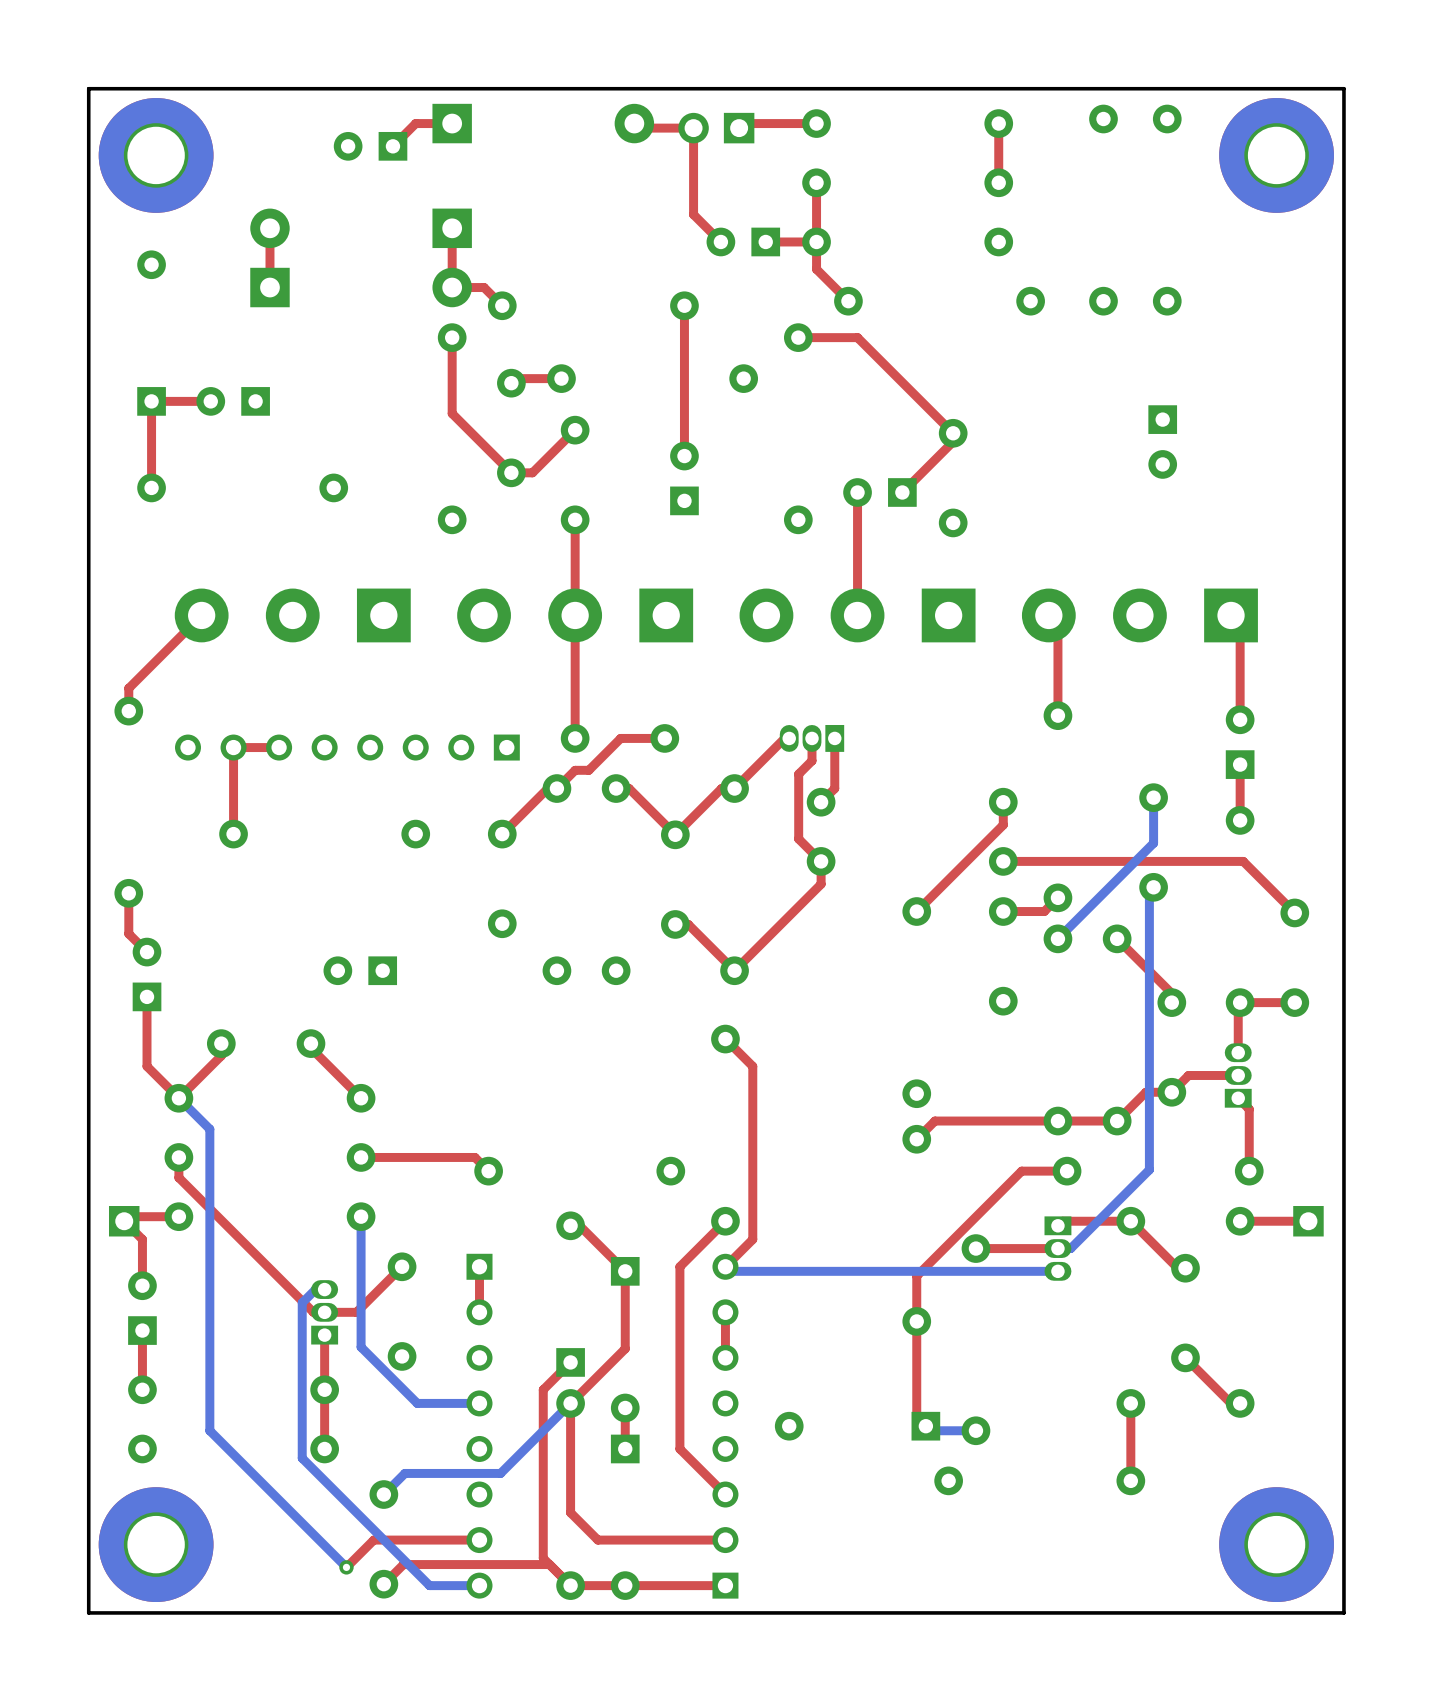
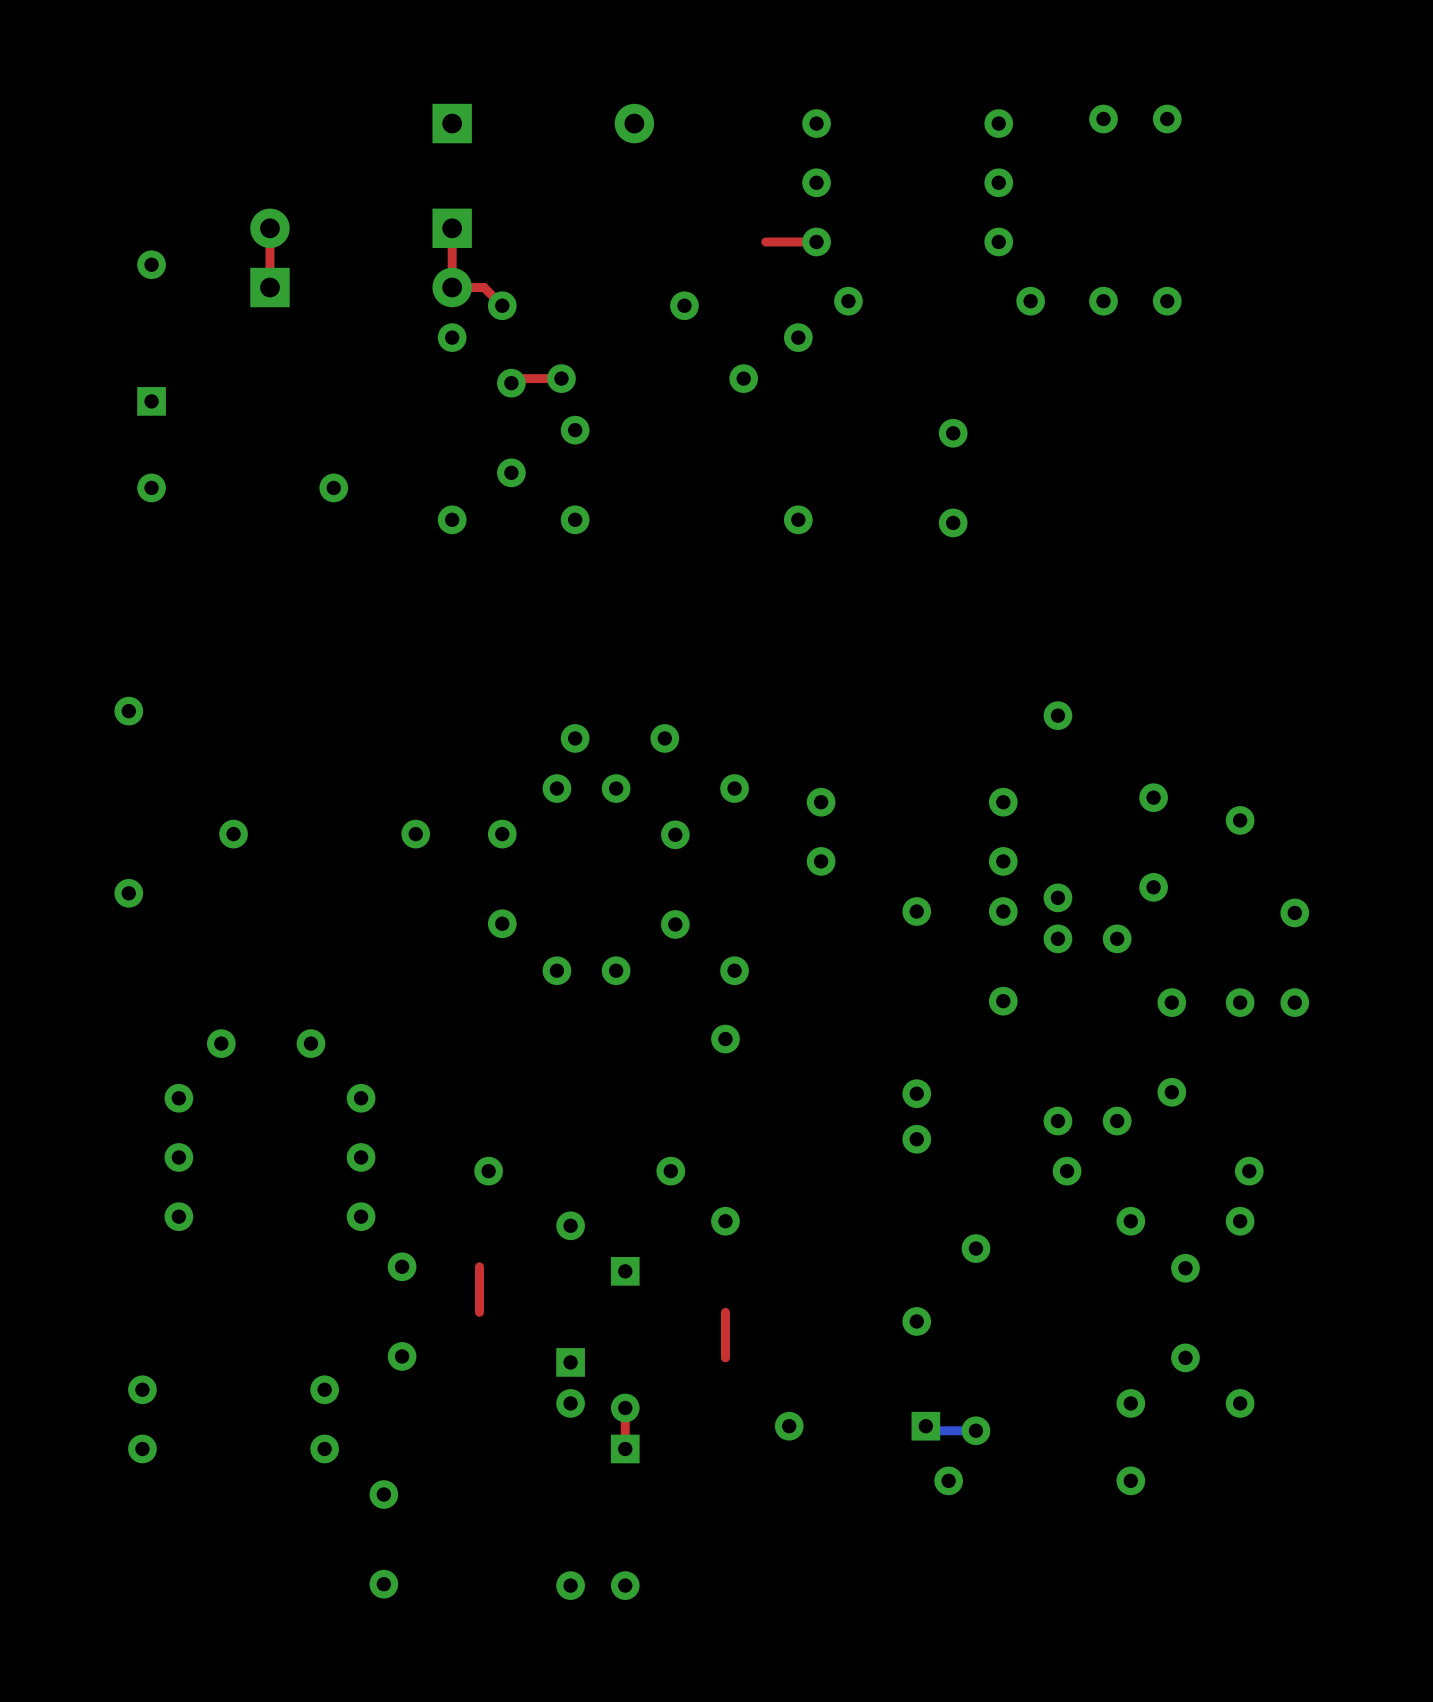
board edge: (1343, 88) (88, 88) (88, 1612) (1343, 1612) (1343, 88) -> none
top track: (452, 123) (415, 123) (392, 146) -> none
top track: (634, 123) (638, 128) (693, 128) (693, 214) (720, 241) -> none
top track: (816, 123) (743, 123) (739, 128) -> none
top track: (998, 123) (998, 182) -> none
part: (716, 128) -> none
part: (370, 146) -> none
part: (156, 155) -> none
part: (1276, 155) -> none
top track: (816, 182) (816, 269) (848, 301) -> none
part: (743, 241) -> none
top track: (684, 305) (684, 456) -> none
top track: (452, 337) (452, 413) (511, 472) (532, 472) (575, 430) -> none
top track: (798, 337) (857, 337) (953, 433) (953, 441) (902, 492) -> none
top track: (210, 401) (151, 401) (151, 487) -> none
part: (233, 401) -> none
part: (1162, 442) -> none
part: (684, 478) -> none
top track: (857, 492) (857, 615) -> none
part: (879, 492) -> none
top track: (575, 519) (575, 738) -> none
top track: (201, 615) (128, 688) (128, 711) -> none
part: (292, 615) -> none
part: (575, 615) -> none
part: (857, 615) -> none
top track: (1048, 615) (1057, 624) (1057, 715) -> none
part: (1139, 615) -> none
top track: (1240, 615) (1240, 719) -> none
top track: (664, 738) (620, 738) (588, 770) (575, 770) (556, 788) (547, 788) (502, 834) -> none
top track: (789, 738) (784, 738) (734, 788) (721, 788) (675, 834) (629, 788) (616, 788) -> none
top track: (811, 738) (811, 760) (798, 774) (798, 839) (821, 861) (821, 884) (734, 970) (688, 924) (675, 924) -> none
part: (811, 738) -> none
top track: (834, 738) (834, 788) (821, 802) -> none
part: (1240, 742) -> none
top track: (279, 747) (233, 747) (233, 834) -> none
part: (347, 747) -> none
top track: (1240, 764) (1240, 820) -> none
bottom track: (1153, 797) (1153, 843) (1057, 938) -> none
top track: (1003, 802) (1003, 824) (916, 911) -> none
top track: (1003, 861) (1243, 861) (1294, 912) -> none
bottom track: (1153, 887) (1149, 891) (1149, 1169) (1070, 1248) (1057, 1248) -> none
top track: (128, 893) (128, 933) (147, 952) -> none
top track: (1057, 897) (1044, 911) (1003, 911) -> none
top track: (1117, 938) (1171, 993) (1171, 1002) -> none
part: (360, 970) -> none
part: (147, 974) -> none
top track: (147, 996) (147, 1066) (178, 1098) (221, 1055) (221, 1043) -> none
top track: (1294, 1002) (1240, 1002) (1238, 1004) (1238, 1052) -> none
top track: (725, 1039) (752, 1066) (752, 1239) (725, 1266) -> none
top track: (310, 1043) (310, 1048) (361, 1098) -> none
top track: (1238, 1075) (1188, 1075) (1171, 1092) (1145, 1092) (1117, 1121) (934, 1121) (916, 1139) -> none
part: (1238, 1075) -> none
bottom track: (178, 1098) (209, 1129) (209, 1430) (346, 1567) -> none
top track: (1238, 1098) (1249, 1109) (1249, 1171) -> none
top track: (178, 1157) (178, 1177) (313, 1312) (356, 1312) (402, 1266) -> none
top track: (361, 1157) (474, 1157) (488, 1171) -> none
top track: (1067, 1171) (1021, 1171) (916, 1276) (916, 1417) (925, 1426) -> none
top track: (178, 1216) (128, 1216) (124, 1221) (142, 1239) (142, 1285) -> none
bottom track: (361, 1216) (361, 1347) (417, 1403) (479, 1403) -> none
part: (124, 1221) -> none
top track: (725, 1221) (679, 1266) (679, 1448) (725, 1494) -> none
top track: (1308, 1221) (1240, 1221) -> none
part: (1308, 1221) -> none
top track: (570, 1225) (579, 1225) (625, 1271) (625, 1348) (570, 1403) (570, 1512) (597, 1540) (725, 1540) -> none
top track: (1057, 1225) (1062, 1221) (1130, 1221) (1177, 1268) (1185, 1268) -> none
top track: (1057, 1248) (975, 1248) -> none
part: (1057, 1248) -> none
bottom track: (725, 1266) (730, 1271) (1057, 1271) -> none
bottom track: (324, 1289) (315, 1289) (302, 1302) (302, 1458) (429, 1585) (479, 1585) -> none
part: (142, 1308) -> none
part: (324, 1312) -> none
top track: (142, 1330) (142, 1389) -> none
top track: (324, 1335) (324, 1448) -> none
top track: (1185, 1357) (1231, 1403) (1240, 1403) -> none
top track: (570, 1362) (543, 1389) (543, 1558) (570, 1585) (725, 1585) -> none
bottom track: (570, 1403) (500, 1473) (404, 1473) (383, 1494) -> none
top track: (1130, 1403) (1130, 1480) -> none
part: (479, 1426) -> none
part: (725, 1426) -> none
top track: (479, 1540) (373, 1540) (346, 1567) -> none
part: (156, 1544) -> none
part: (1276, 1544) -> none
top track: (549, 1564) (403, 1564) (383, 1584) -> none
via: (346, 1567) -> none

